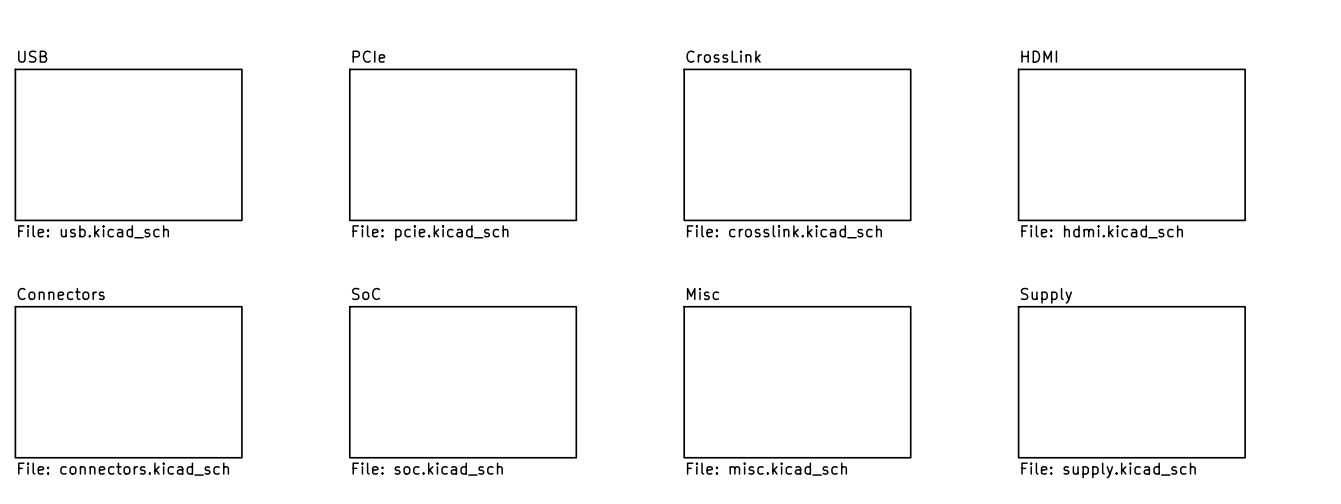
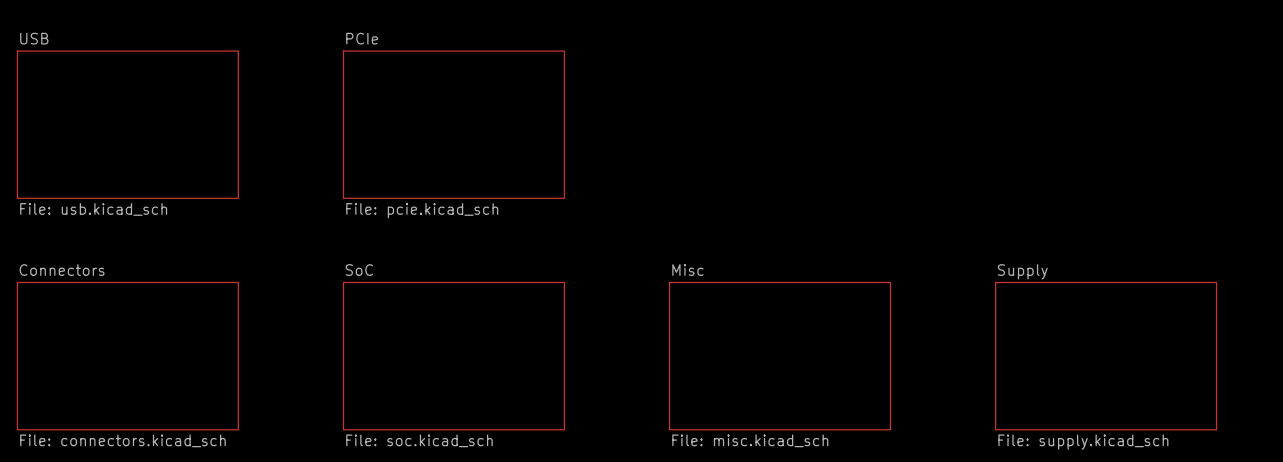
sheet CrossLink: File: crosslink.kicad_sch (797, 144) -> none
sheet HDMI: File: hdmi.kicad_sch (1131, 144) -> none

